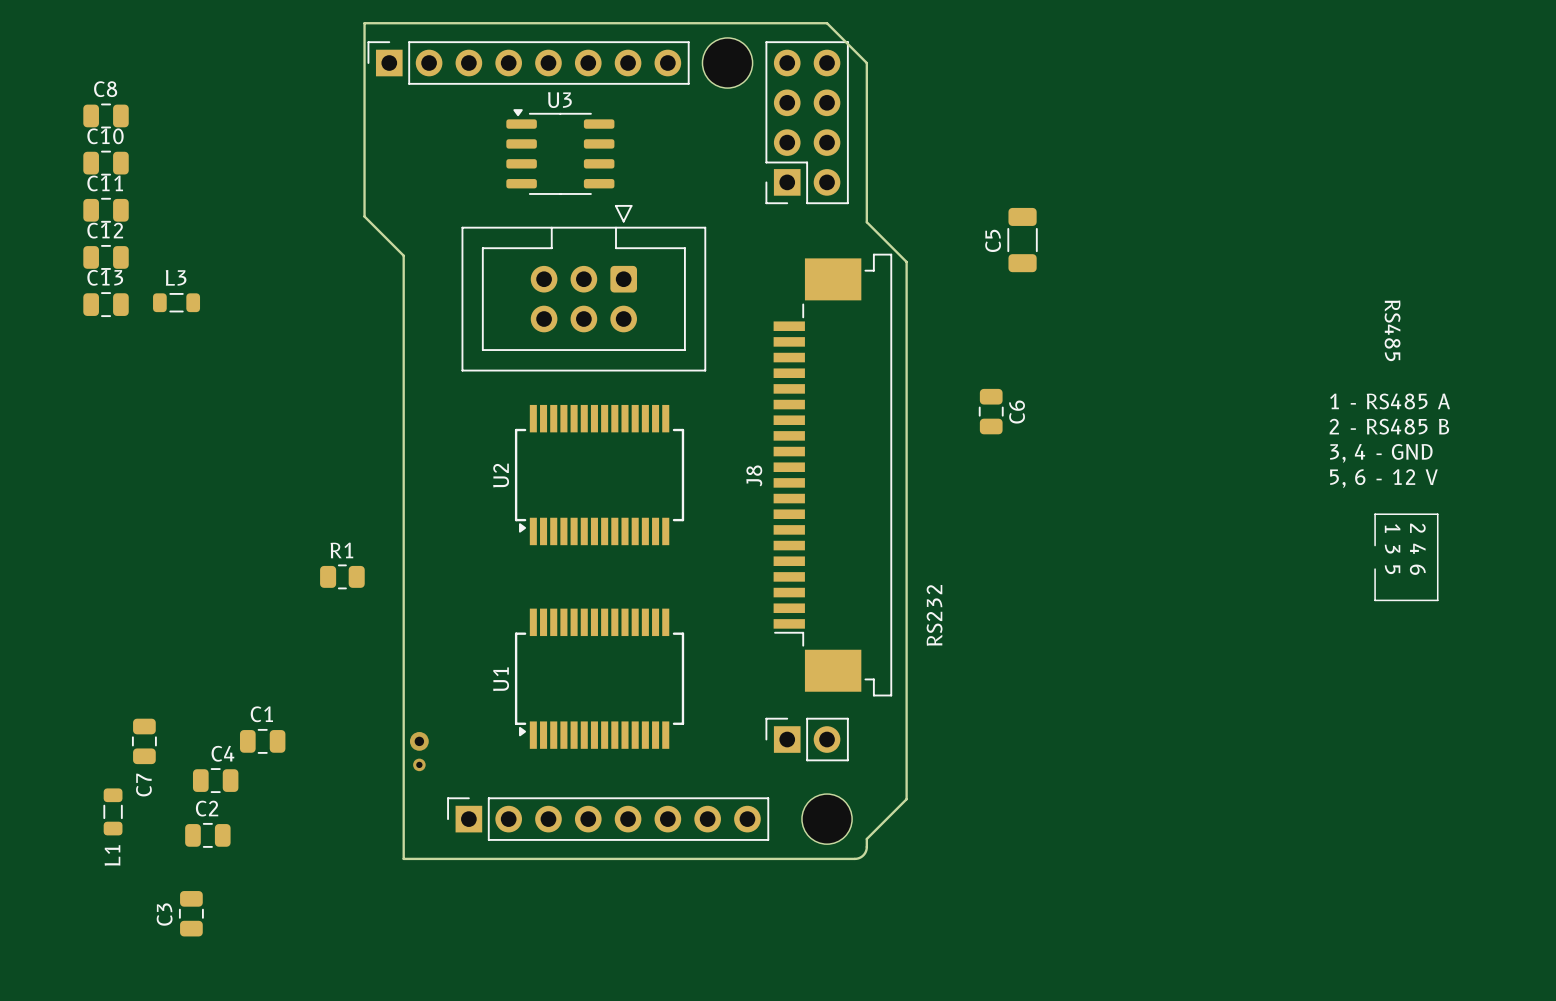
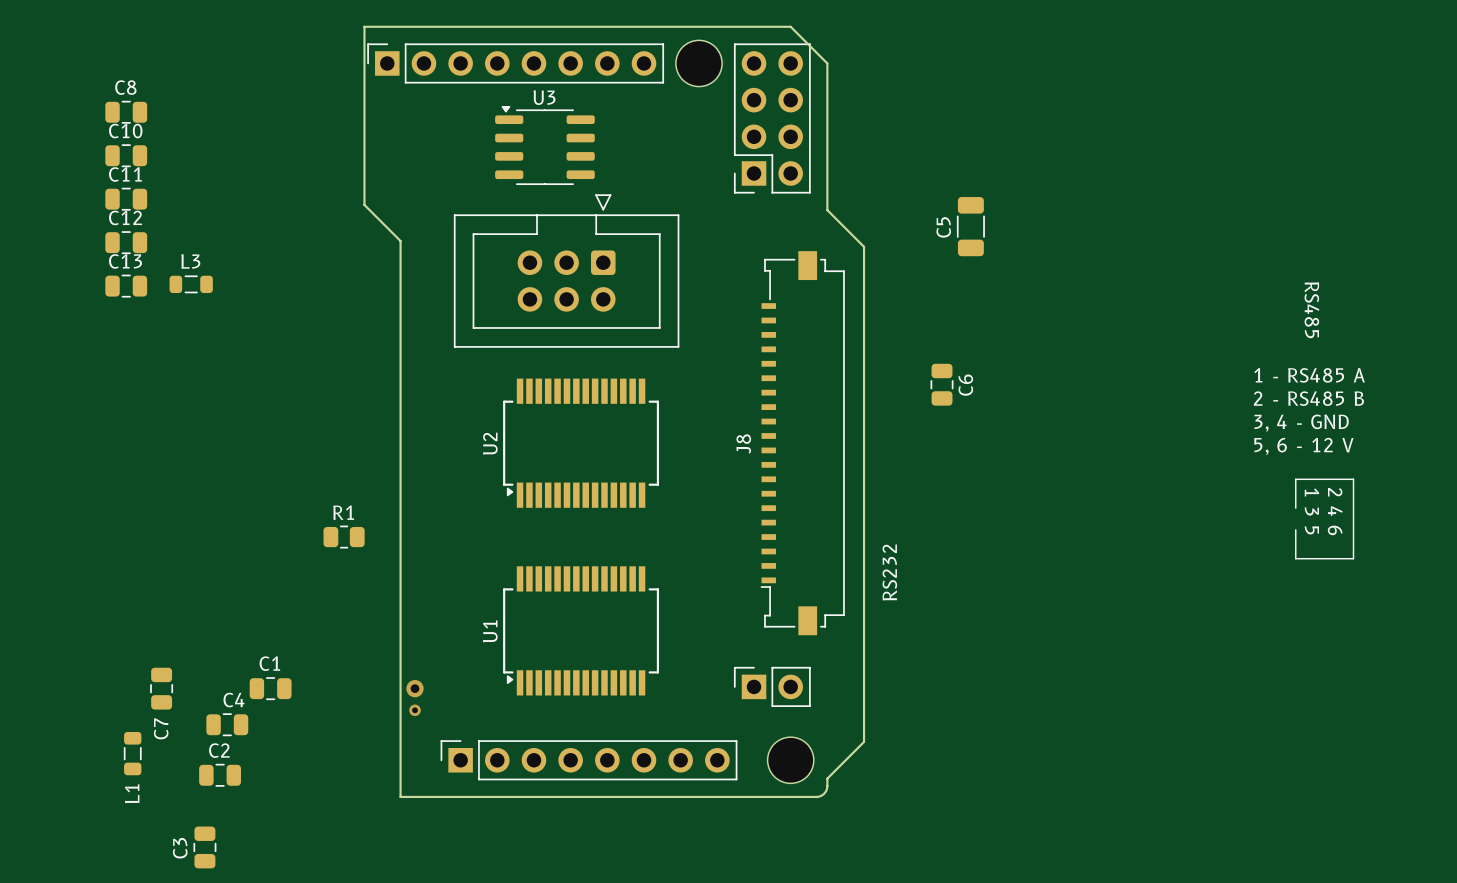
J8 footprint: [773, 253, 893, 697] -> [760, 251, 845, 636]

